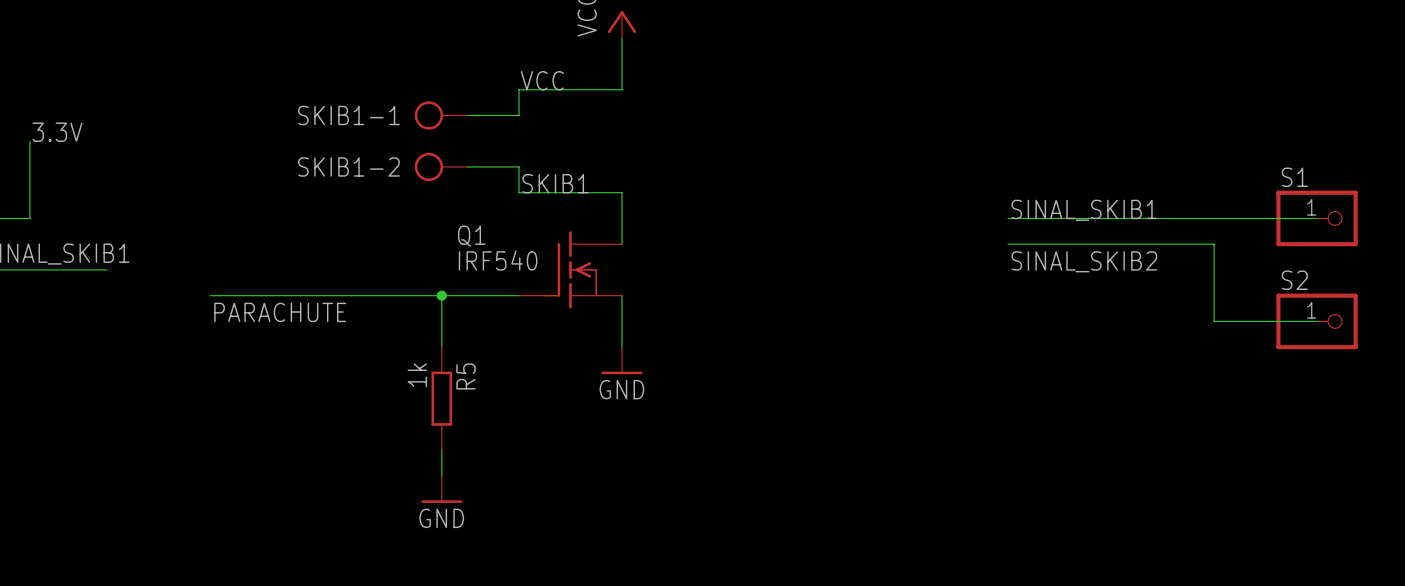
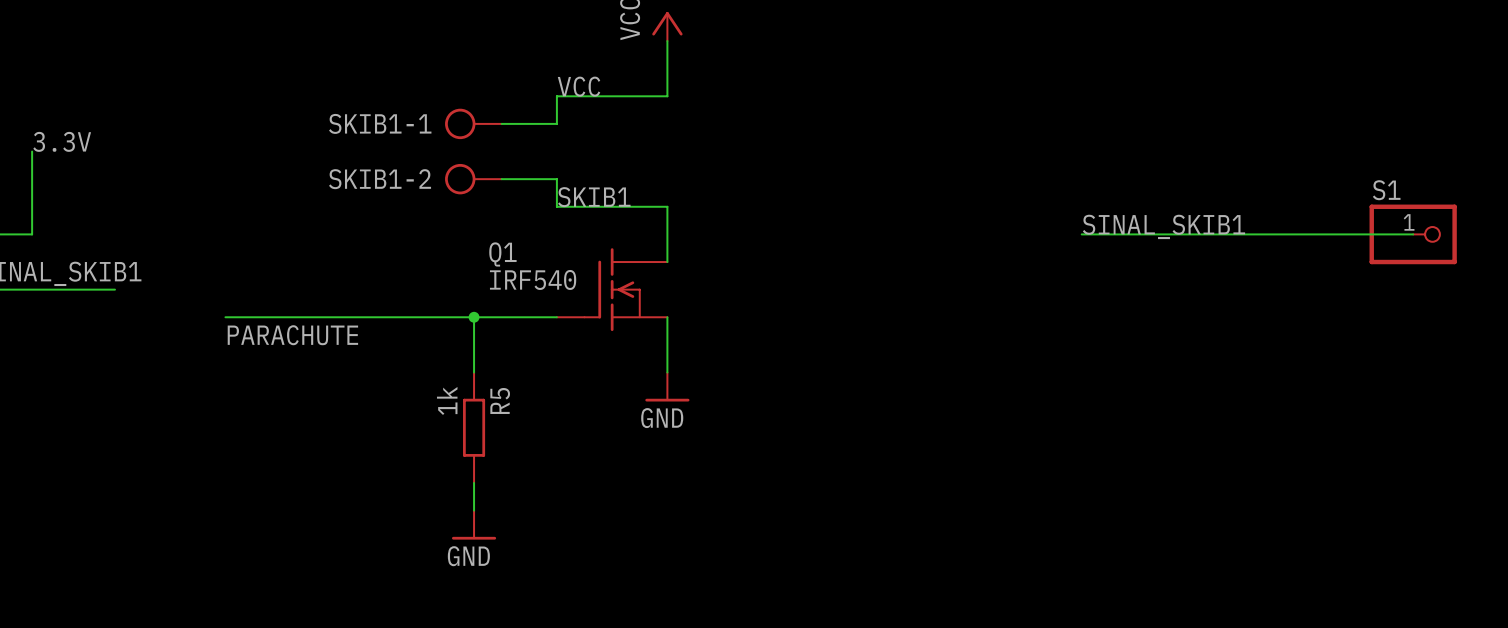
wire: (1008, 244) (1214, 244) (1214, 321) (1317, 321) -> none
label: SINAL_SKIB2 (1084, 261) -> none
S2: (1317, 321) -> none

